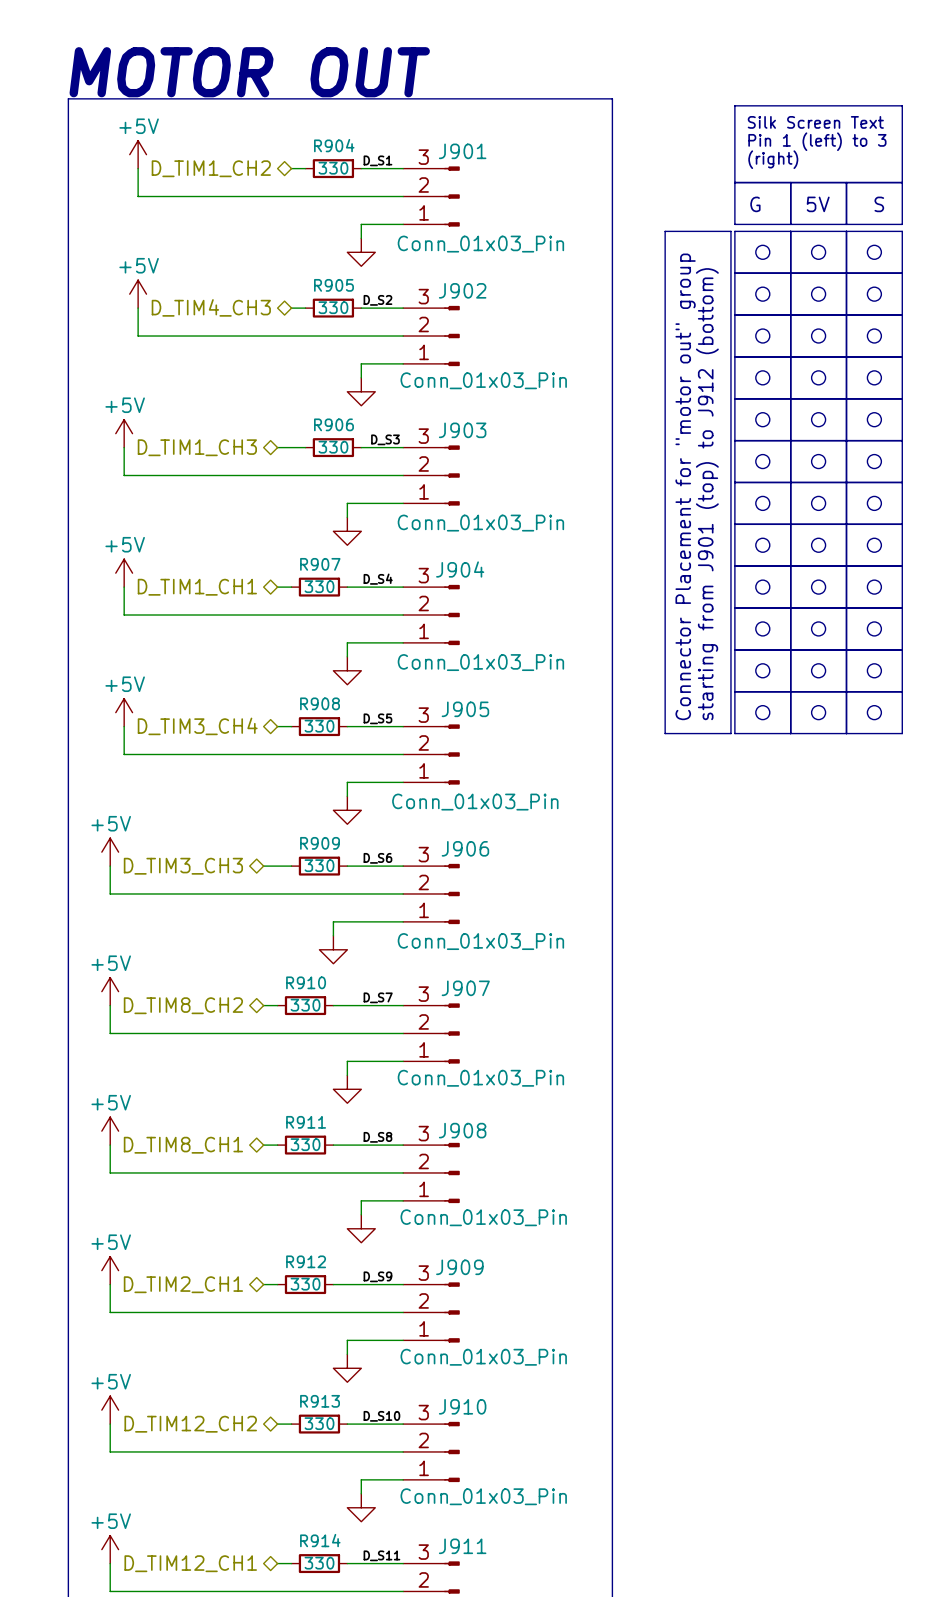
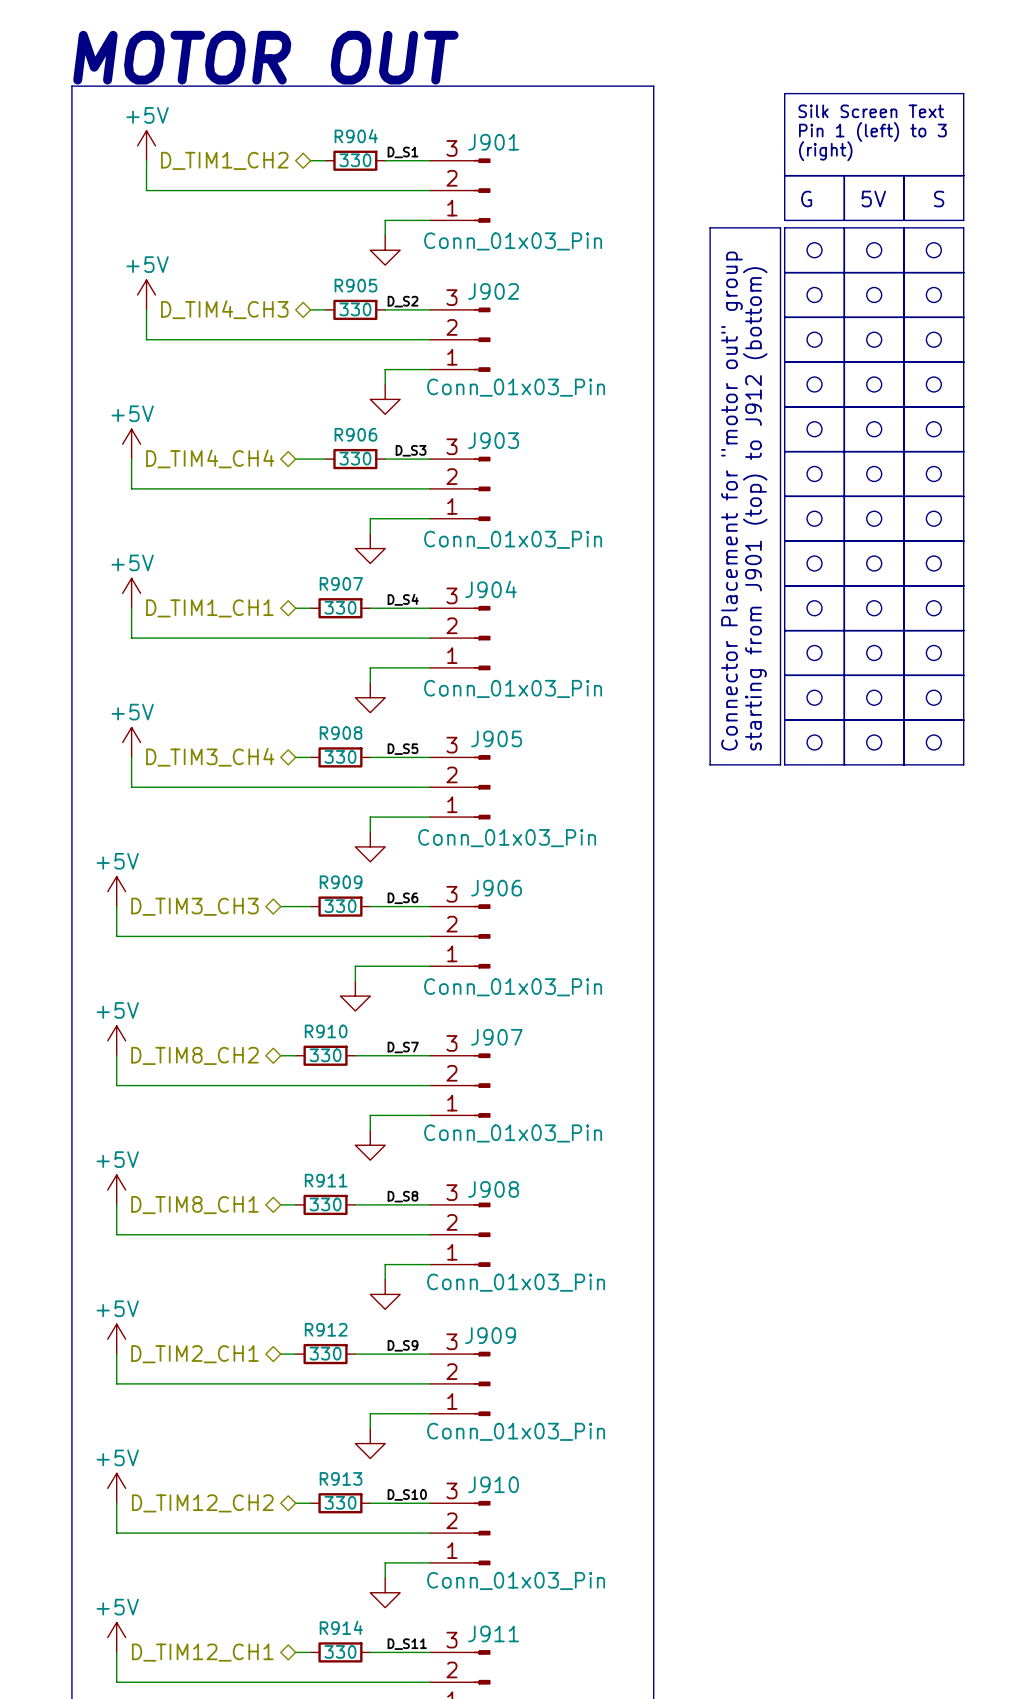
hierarchical label: D_TIM1_CH3 (197, 447) -> D_TIM4_CH4 (210, 458)

